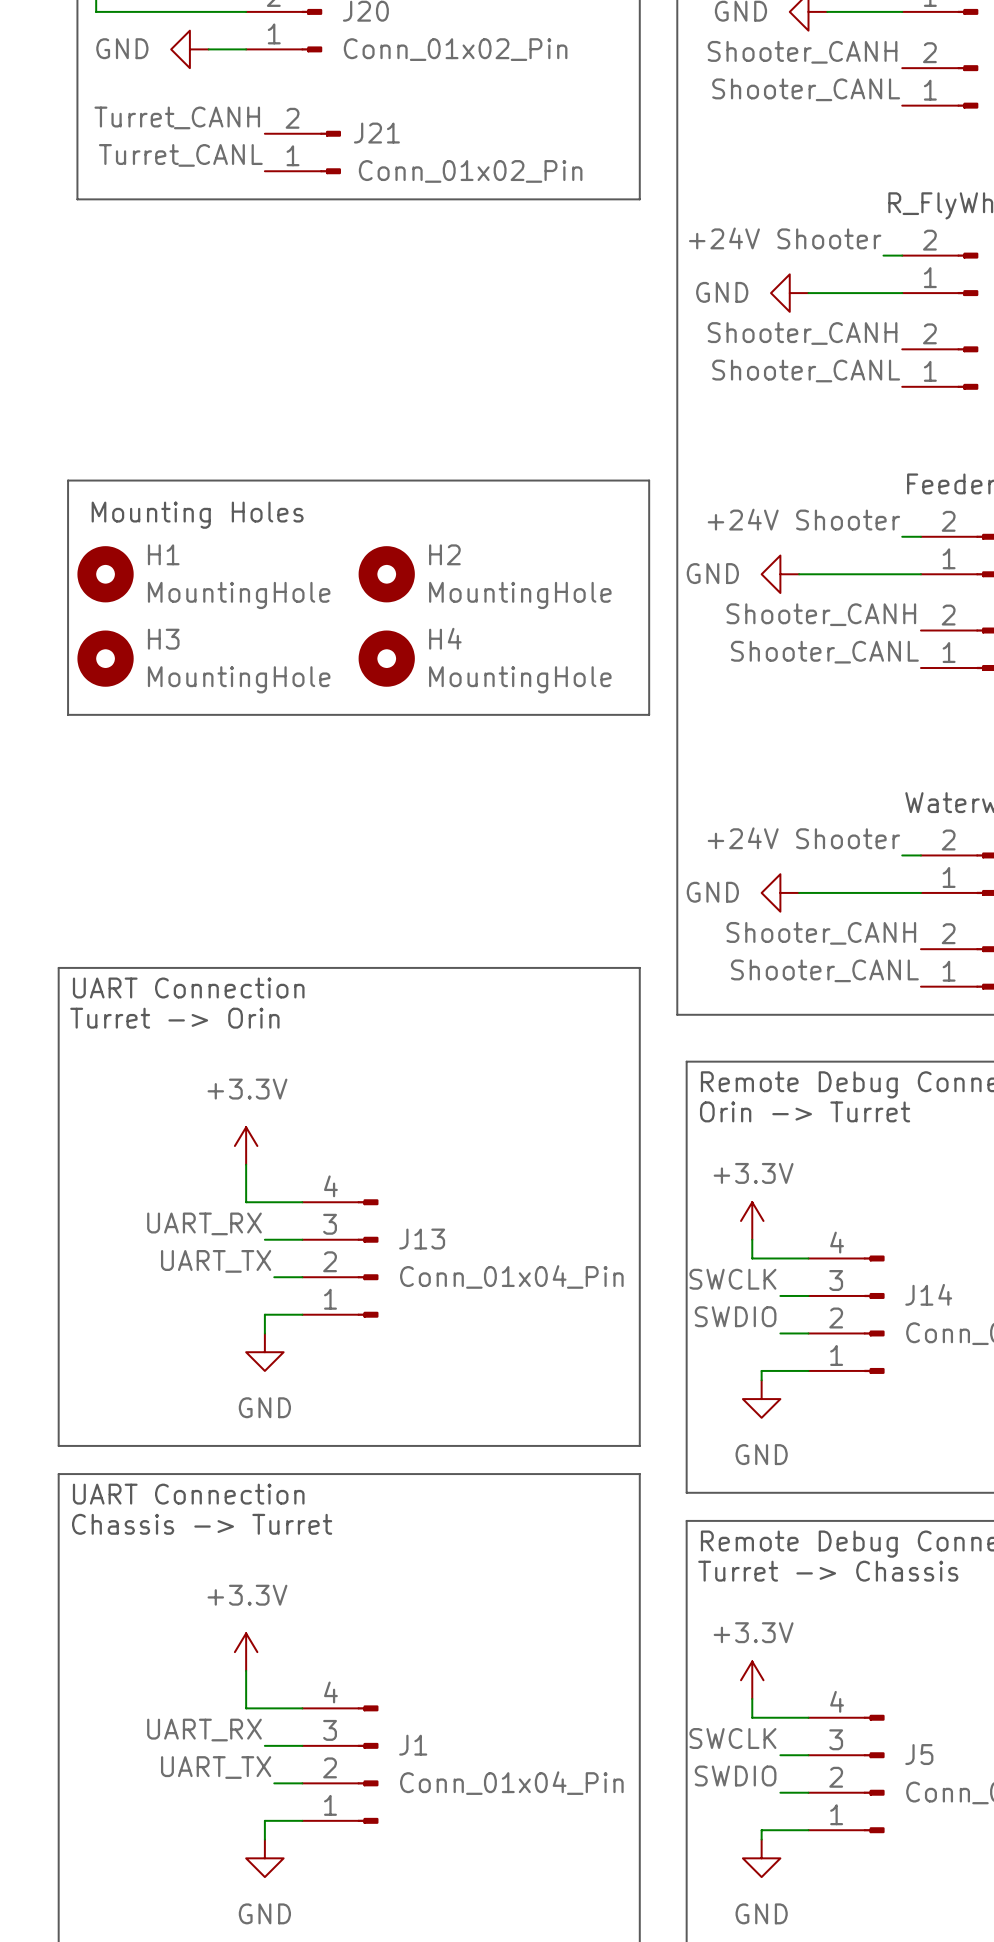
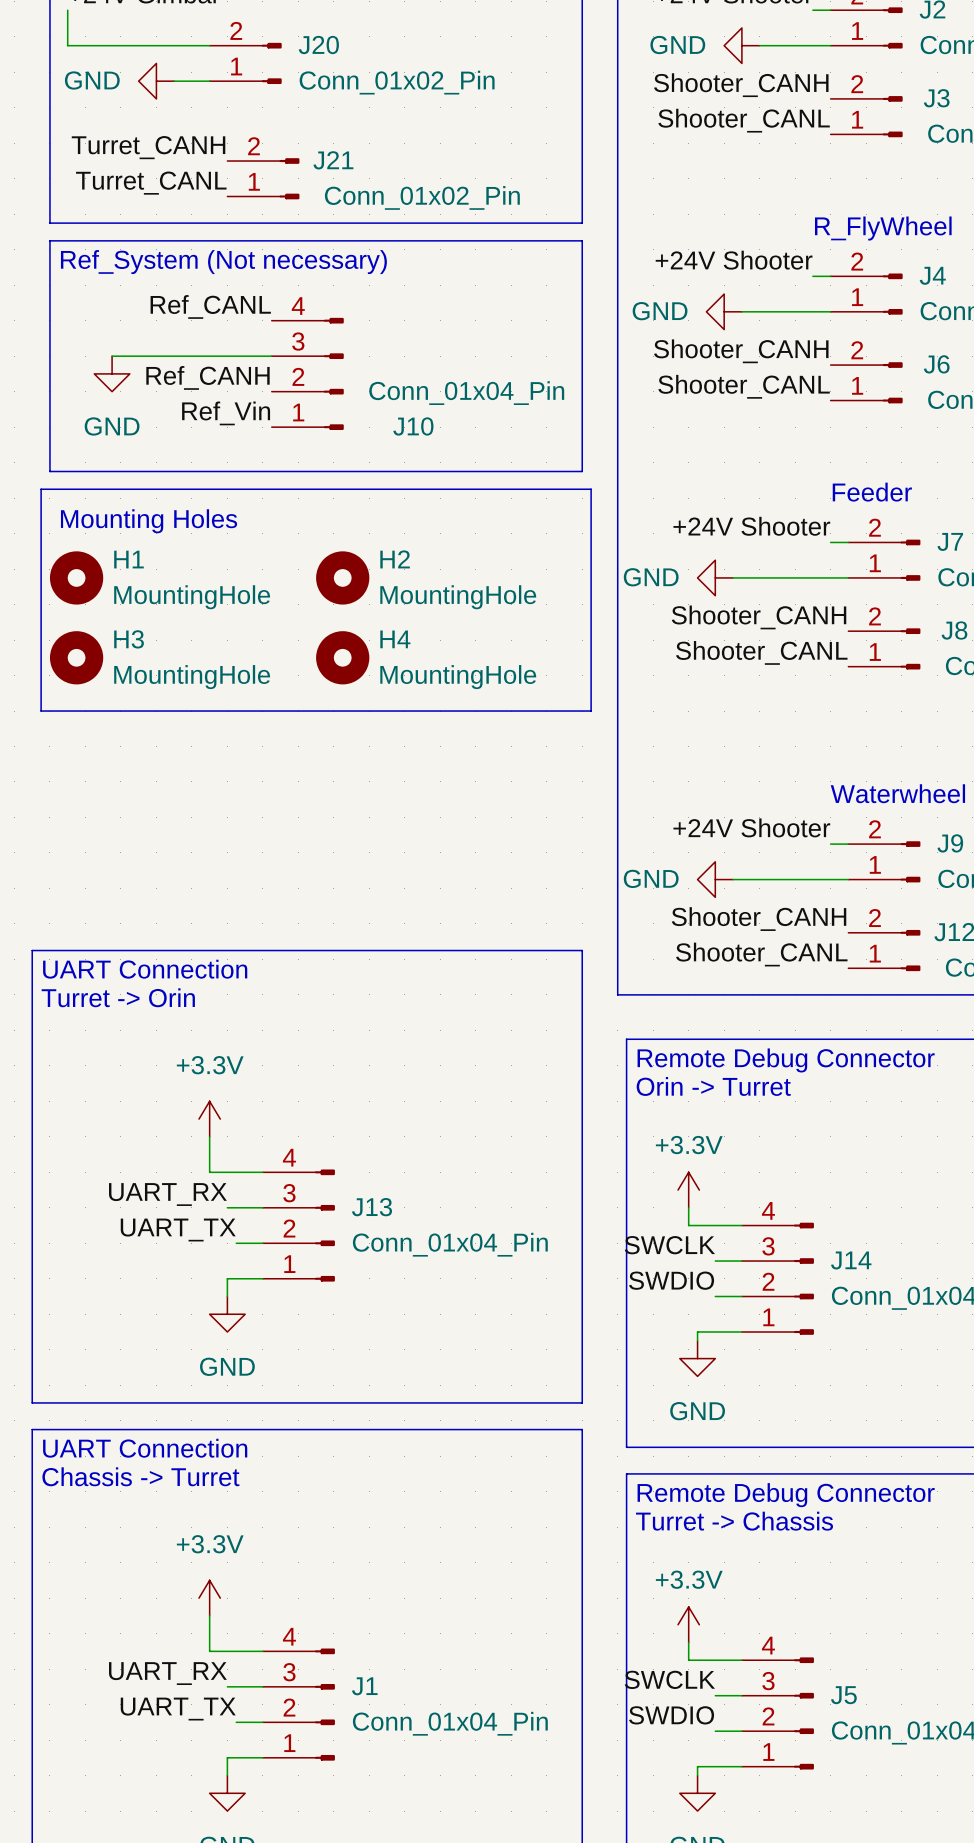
line: none -> (49, 240) (582, 240) (582, 471) (49, 471) (49, 240)
text: none -> Ref_System (Not necessary) (223, 262)
label: none -> Ref_CANL (210, 306)
wire: none -> (112, 356) (271, 356)
power symbol: none -> GND (112, 373)
J10: none -> Conn_01x04_Pin (307, 373)
label: none -> Ref_CANH (207, 377)
label: none -> Ref_Vin (226, 413)

